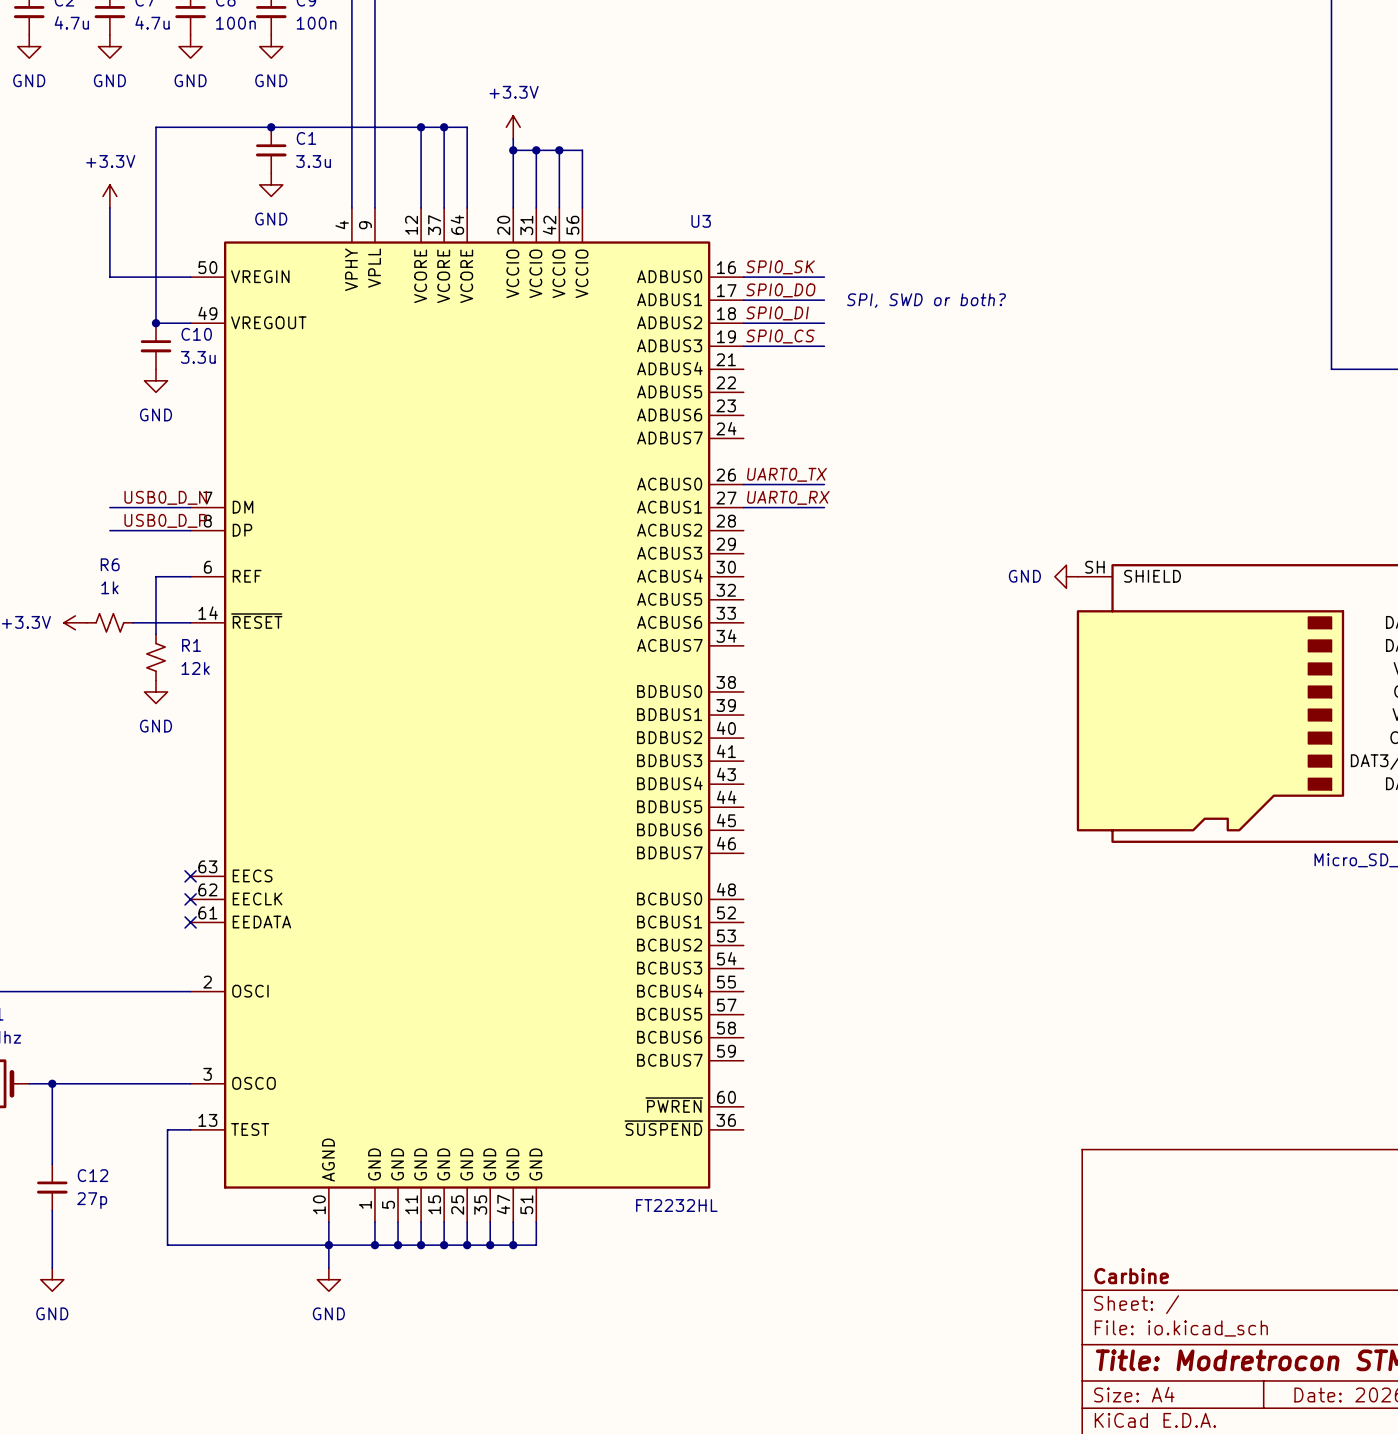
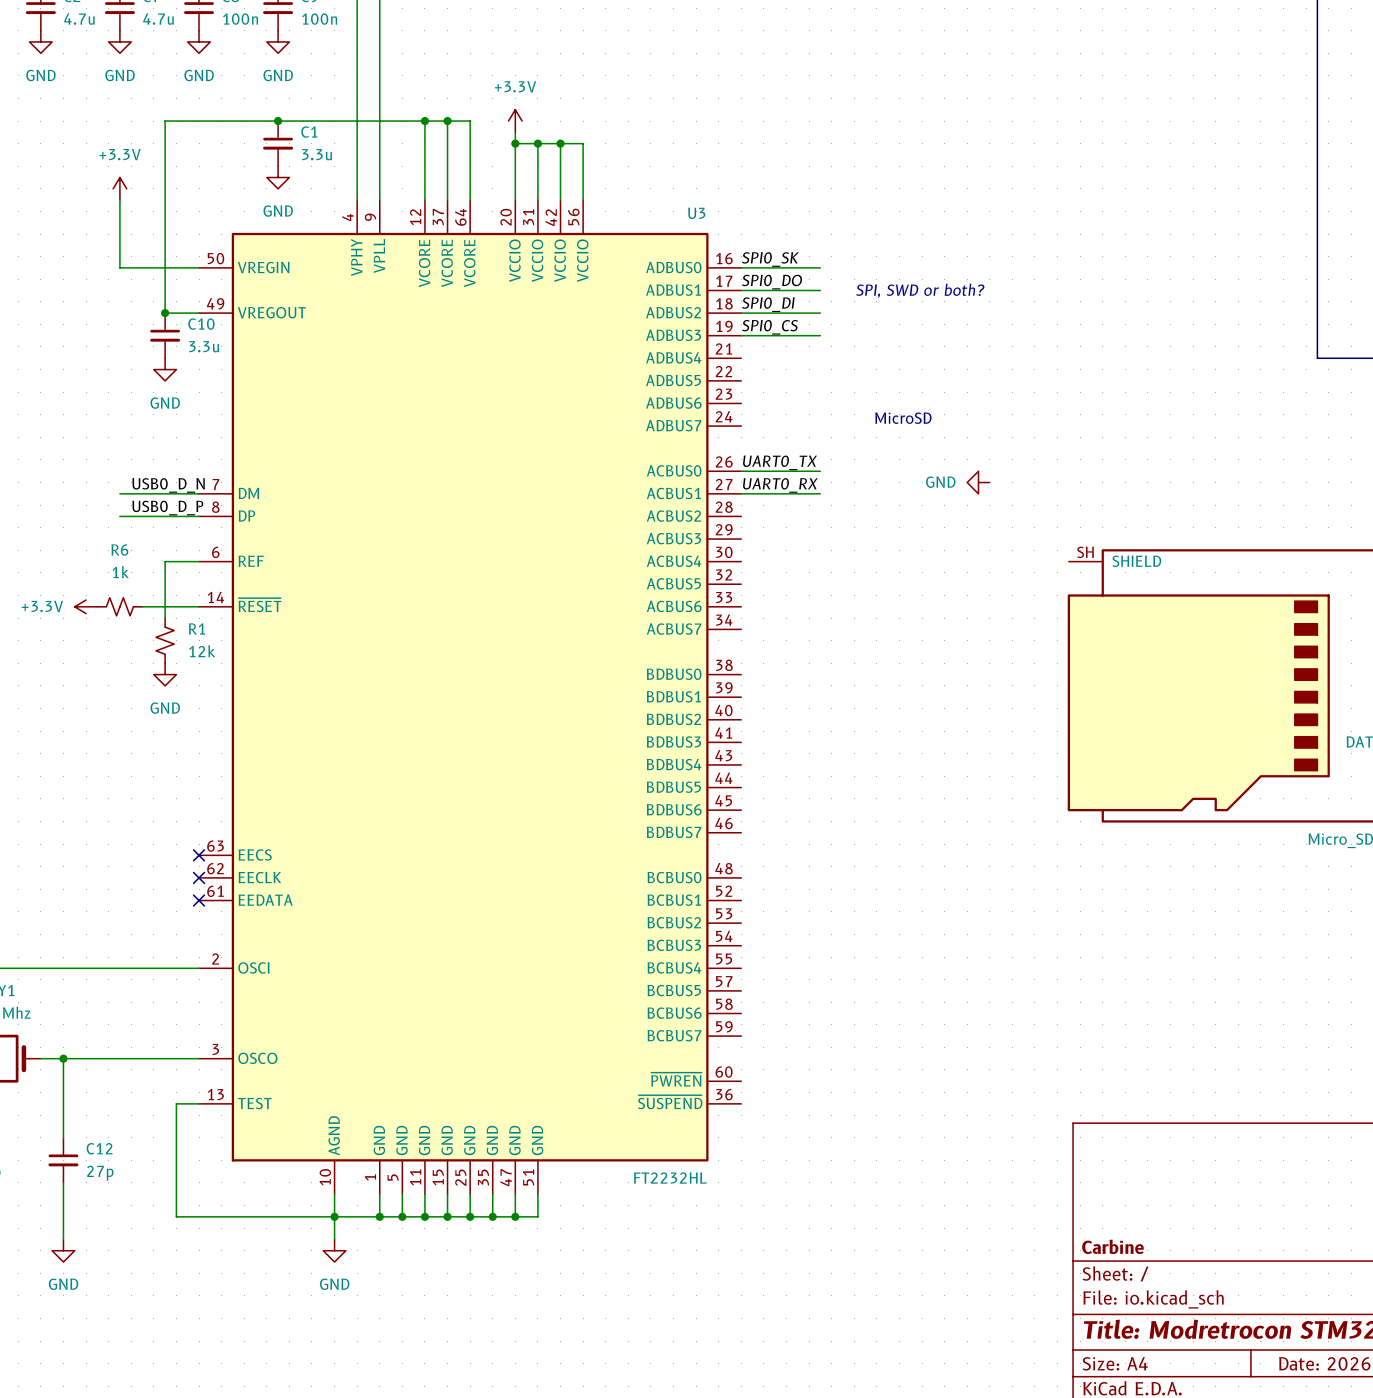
text: none -> MicroSD (903, 418)
power symbol position: GND (1066, 576) -> GND (978, 482)

